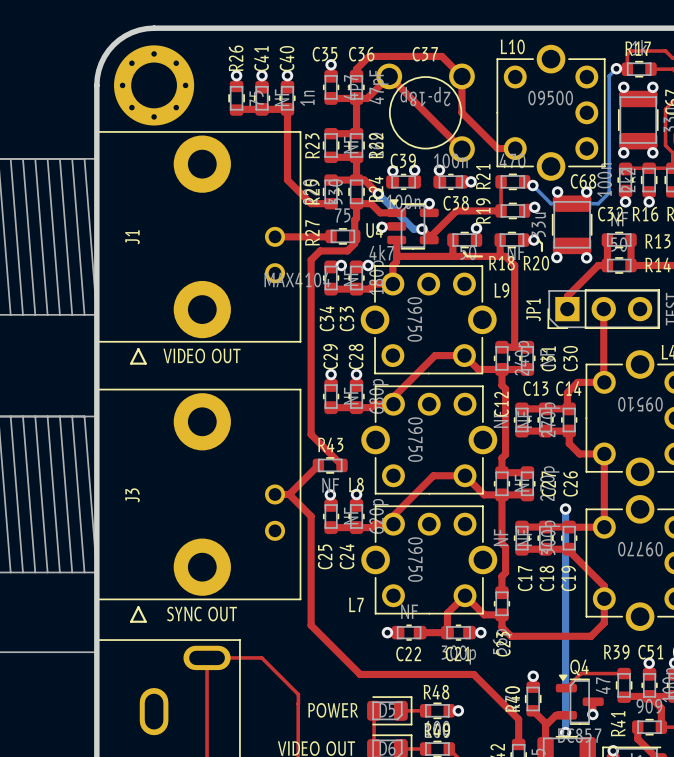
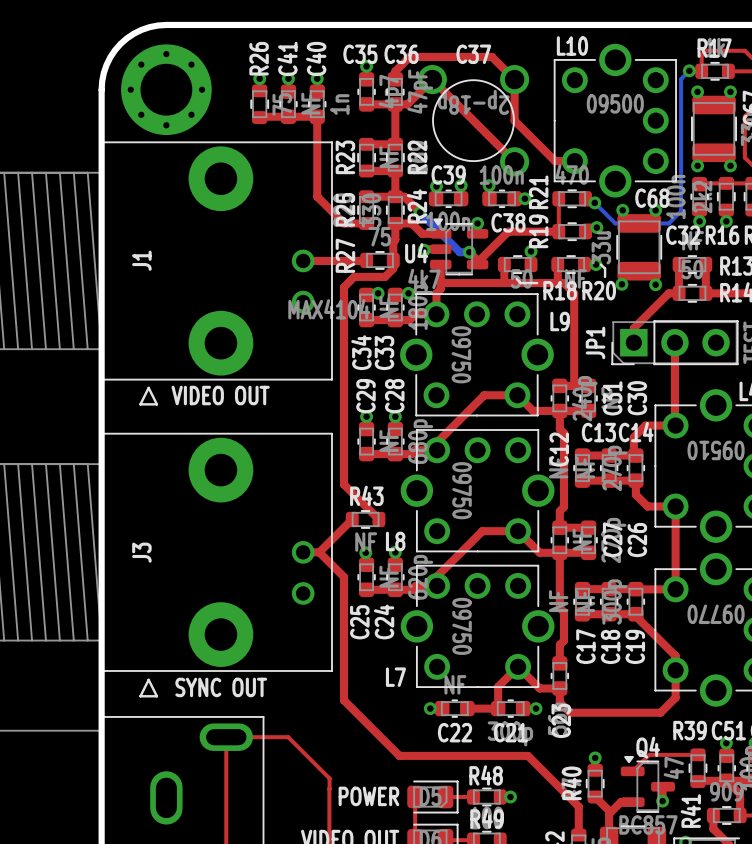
bottom track: (565, 509) (565, 732) -> none
via: (565, 509) -> none
via: (565, 732) -> none

